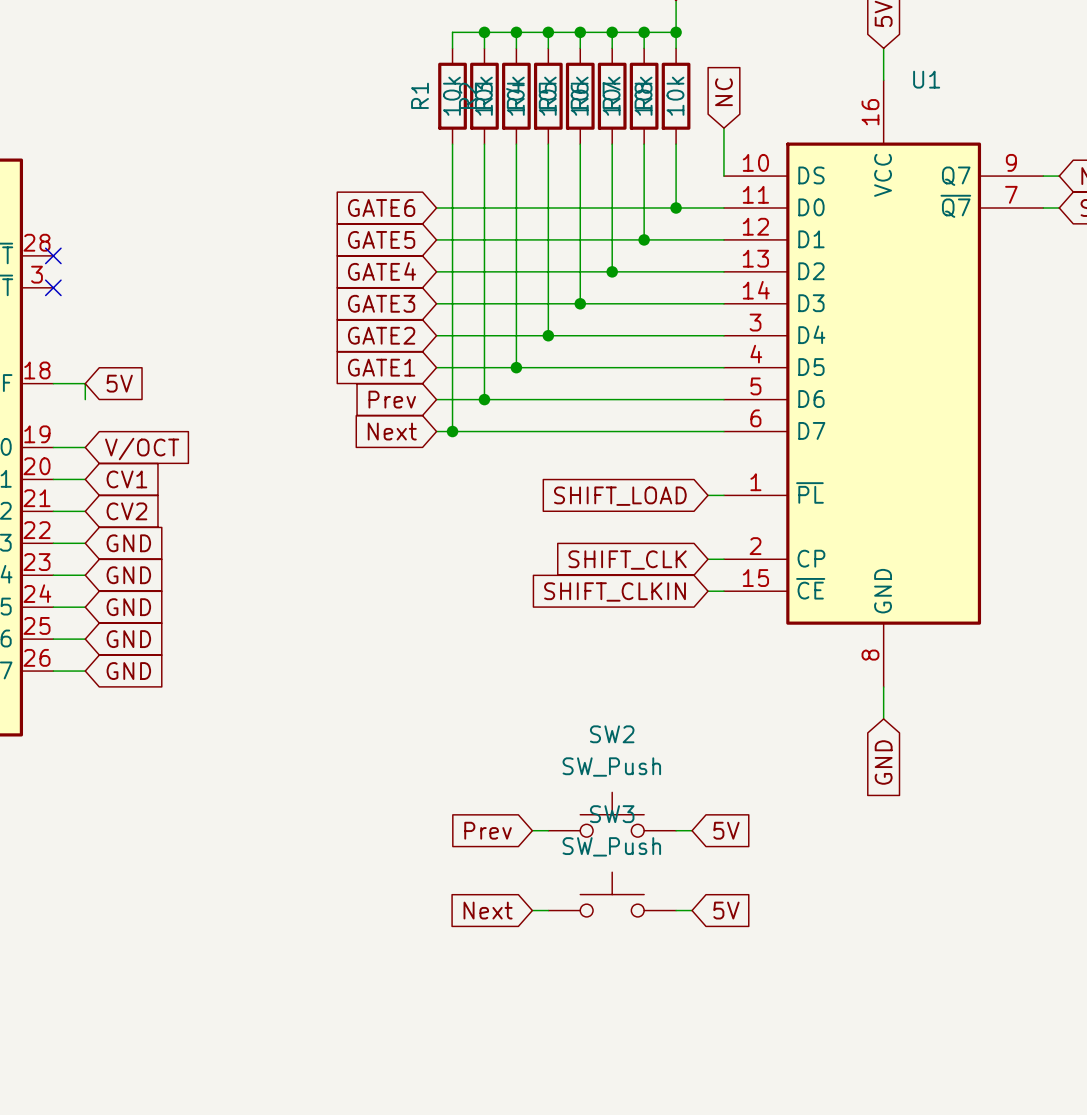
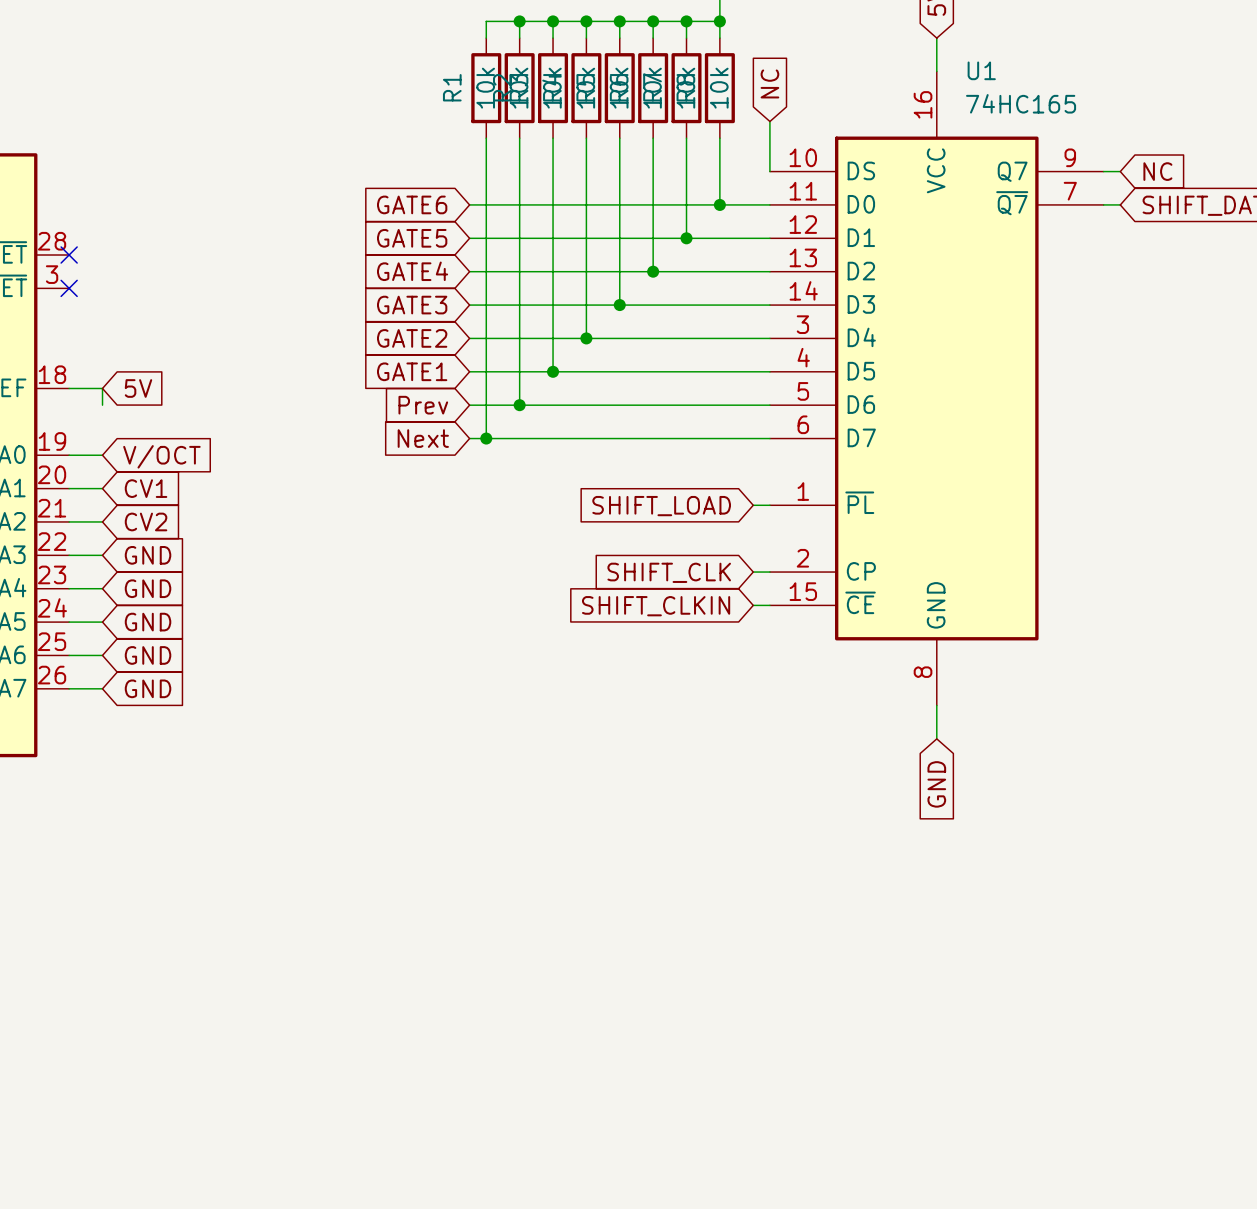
U1 value: none -> 74HC165 (1021, 103)
SW2: SW_Push (612, 814) -> none
global label: Prev (488, 830) -> none
wire: (532, 830) (548, 830) -> none
wire: (676, 830) (692, 830) -> none
global label: 5V (726, 830) -> none
SW3: SW_Push (612, 894) -> none
global label: Next (488, 910) -> none
wire: (532, 910) (548, 910) -> none
wire: (676, 910) (692, 910) -> none
global label: 5V (726, 910) -> none

